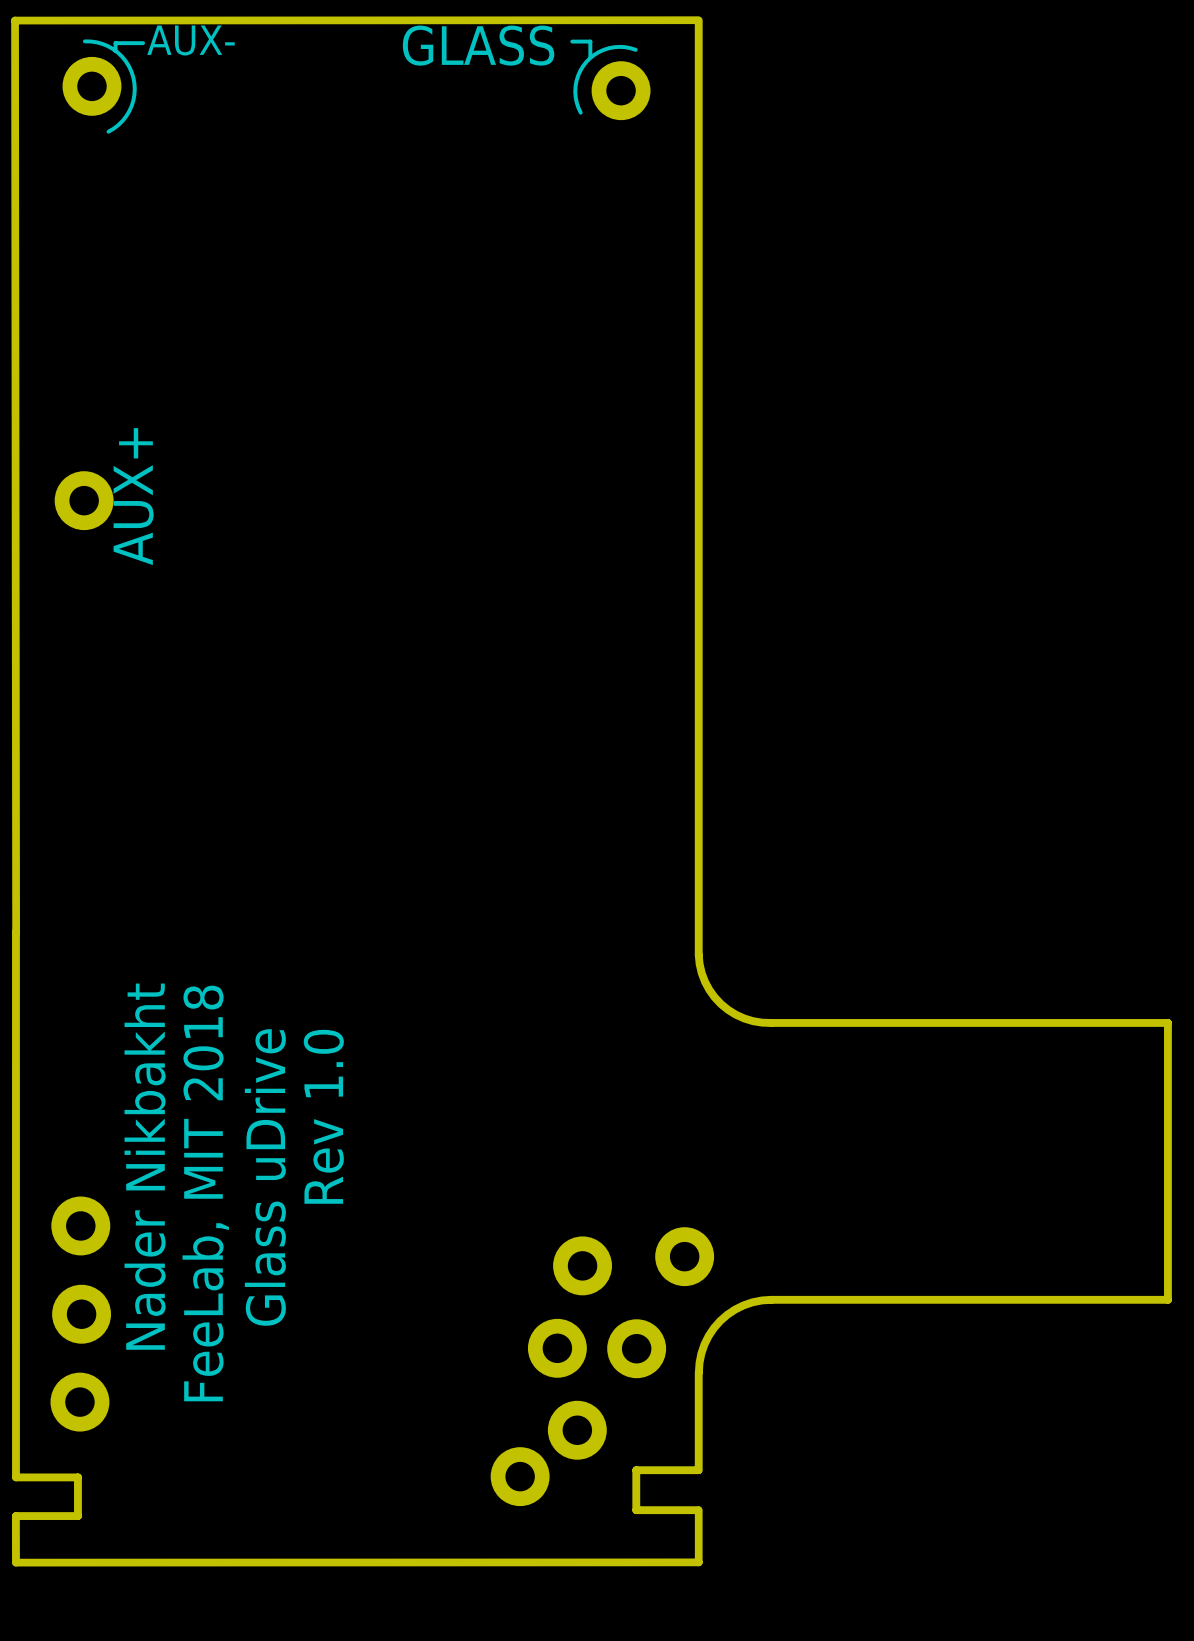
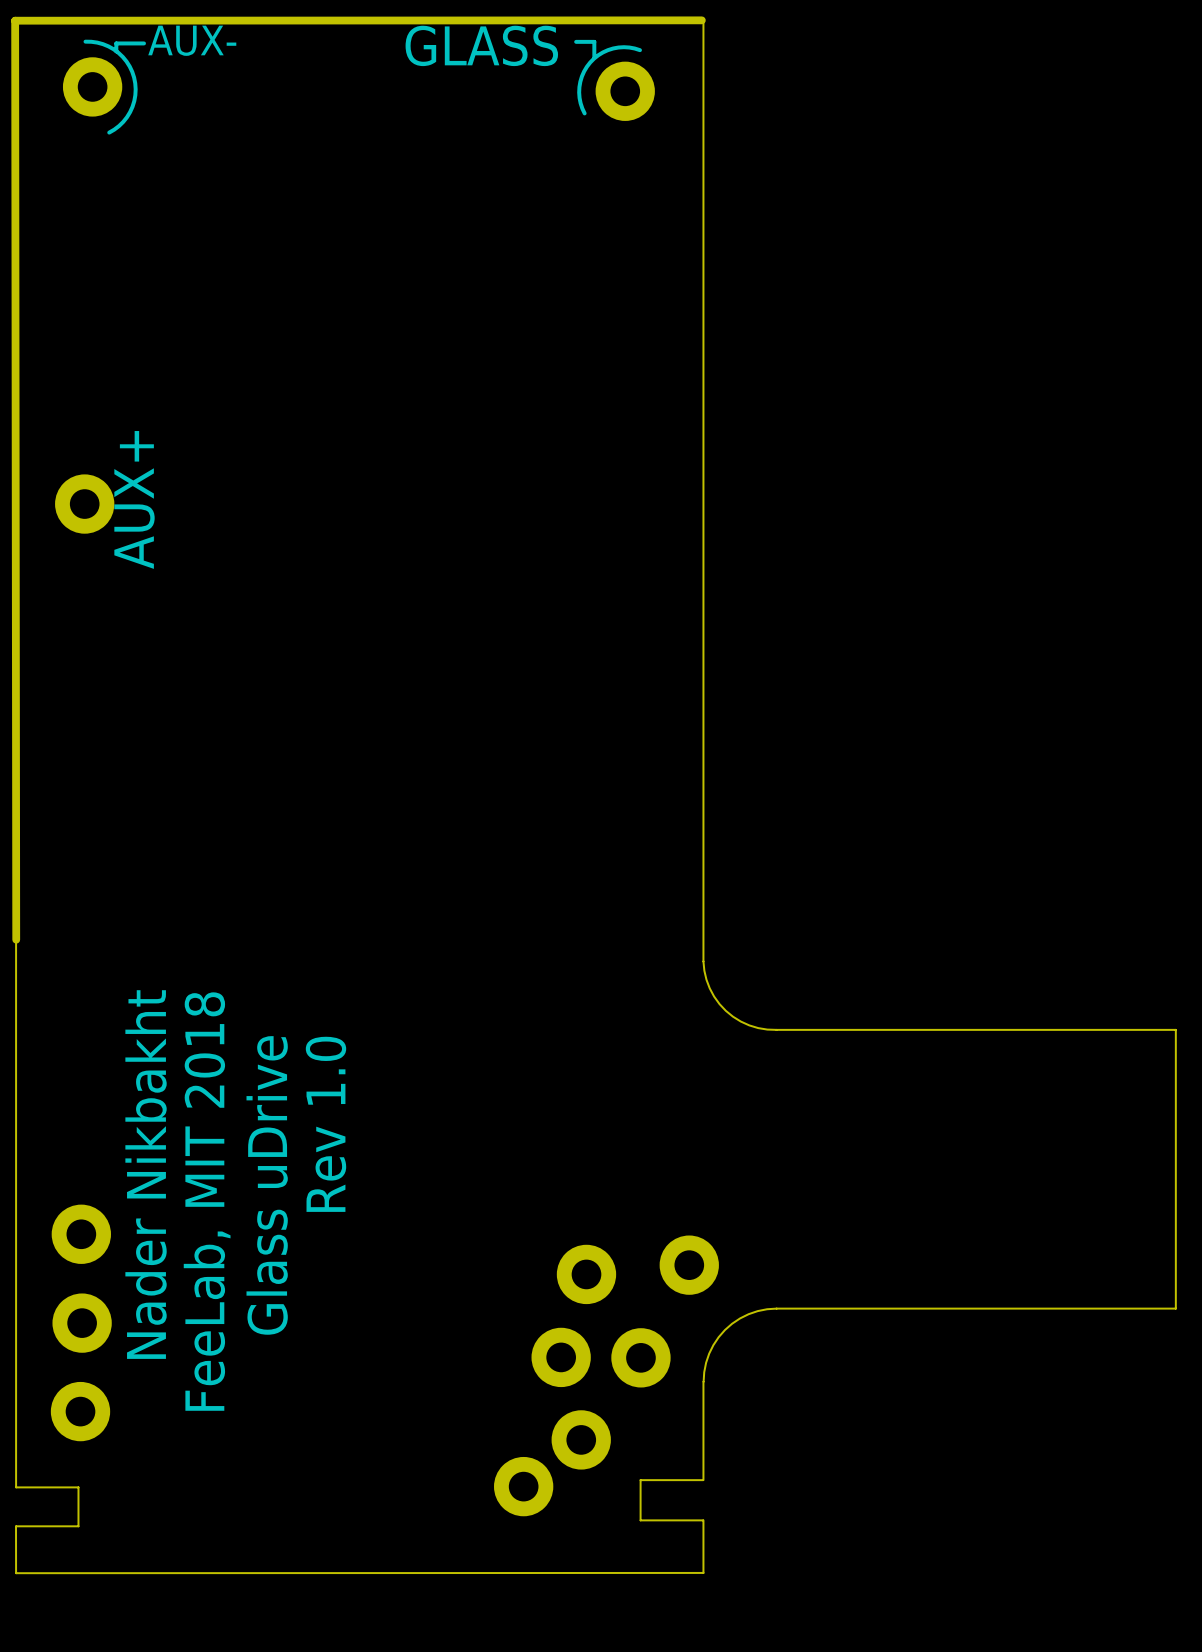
board edge width: thick (698, 20) (698, 955) (704, 981) (714, 997) (728, 1009) (744, 1018) (762, 1022) (1167, 1022) (1167, 1299) (771, 1299) (743, 1305) (720, 1321) (708, 1336) (701, 1353) (698, 1372) (698, 1470) -> thin (703, 20) (703, 961) (709, 988) (719, 1004) (733, 1016) (749, 1025) (767, 1029) (1175, 1029) (1175, 1308) (776, 1308) (748, 1314) (724, 1330) (713, 1345) (706, 1362) (703, 1381) (703, 1480)
board edge width: thick (15, 931) (15, 1477) (77, 1477) (77, 1516) (16, 1516) (15, 1562) (698, 1562) (698, 1510) -> thin (16, 937) (16, 1487) (78, 1487) (78, 1526) (16, 1526) (16, 1573) (703, 1572) (703, 1520)
board edge width: thick (698, 1470) (636, 1470) (636, 1510) (698, 1510) -> thin (702, 1480) (640, 1480) (640, 1520) (702, 1520)

